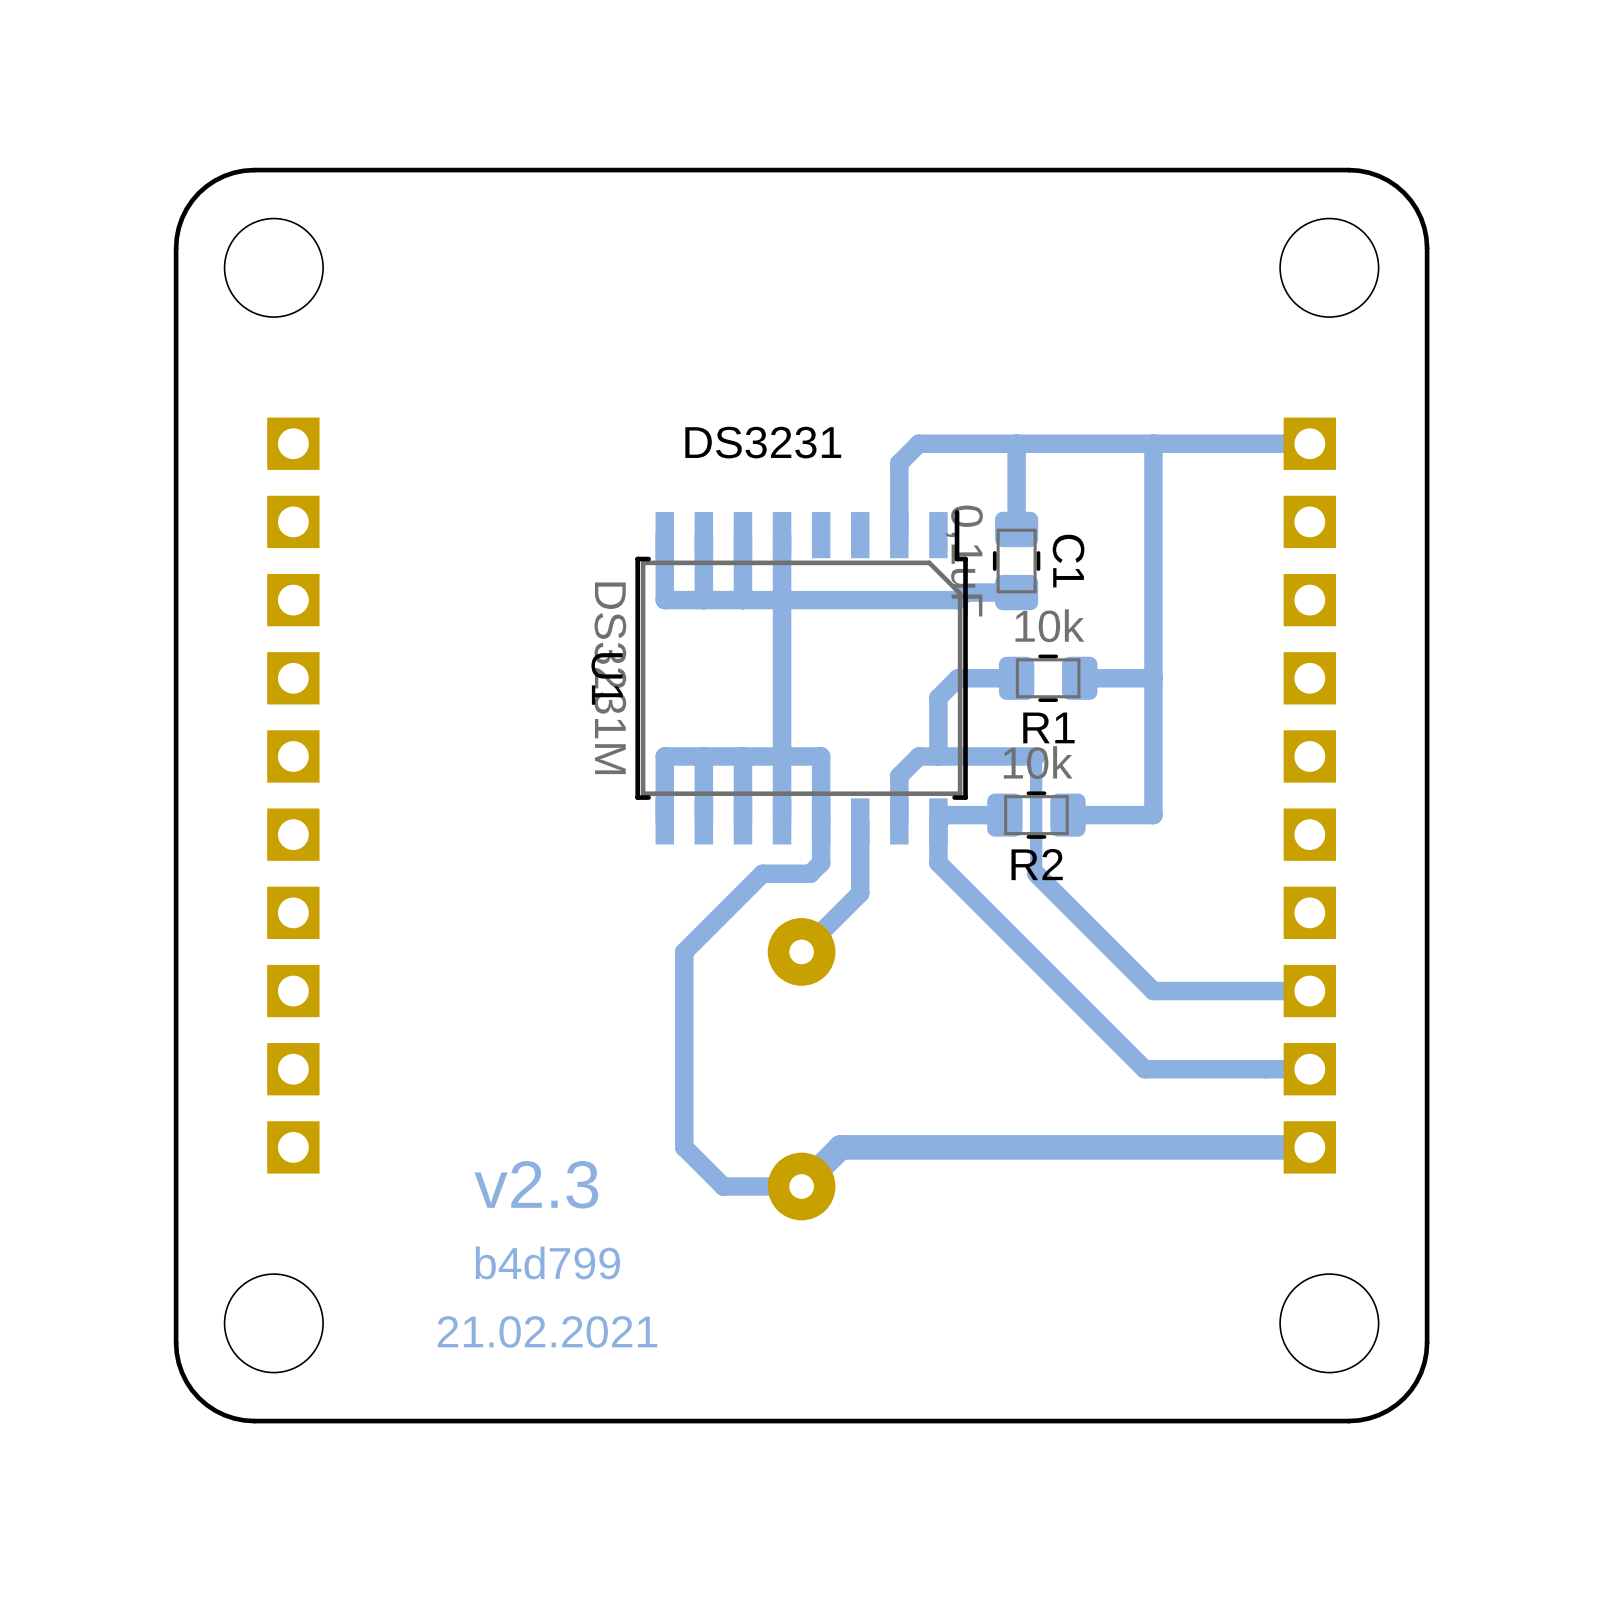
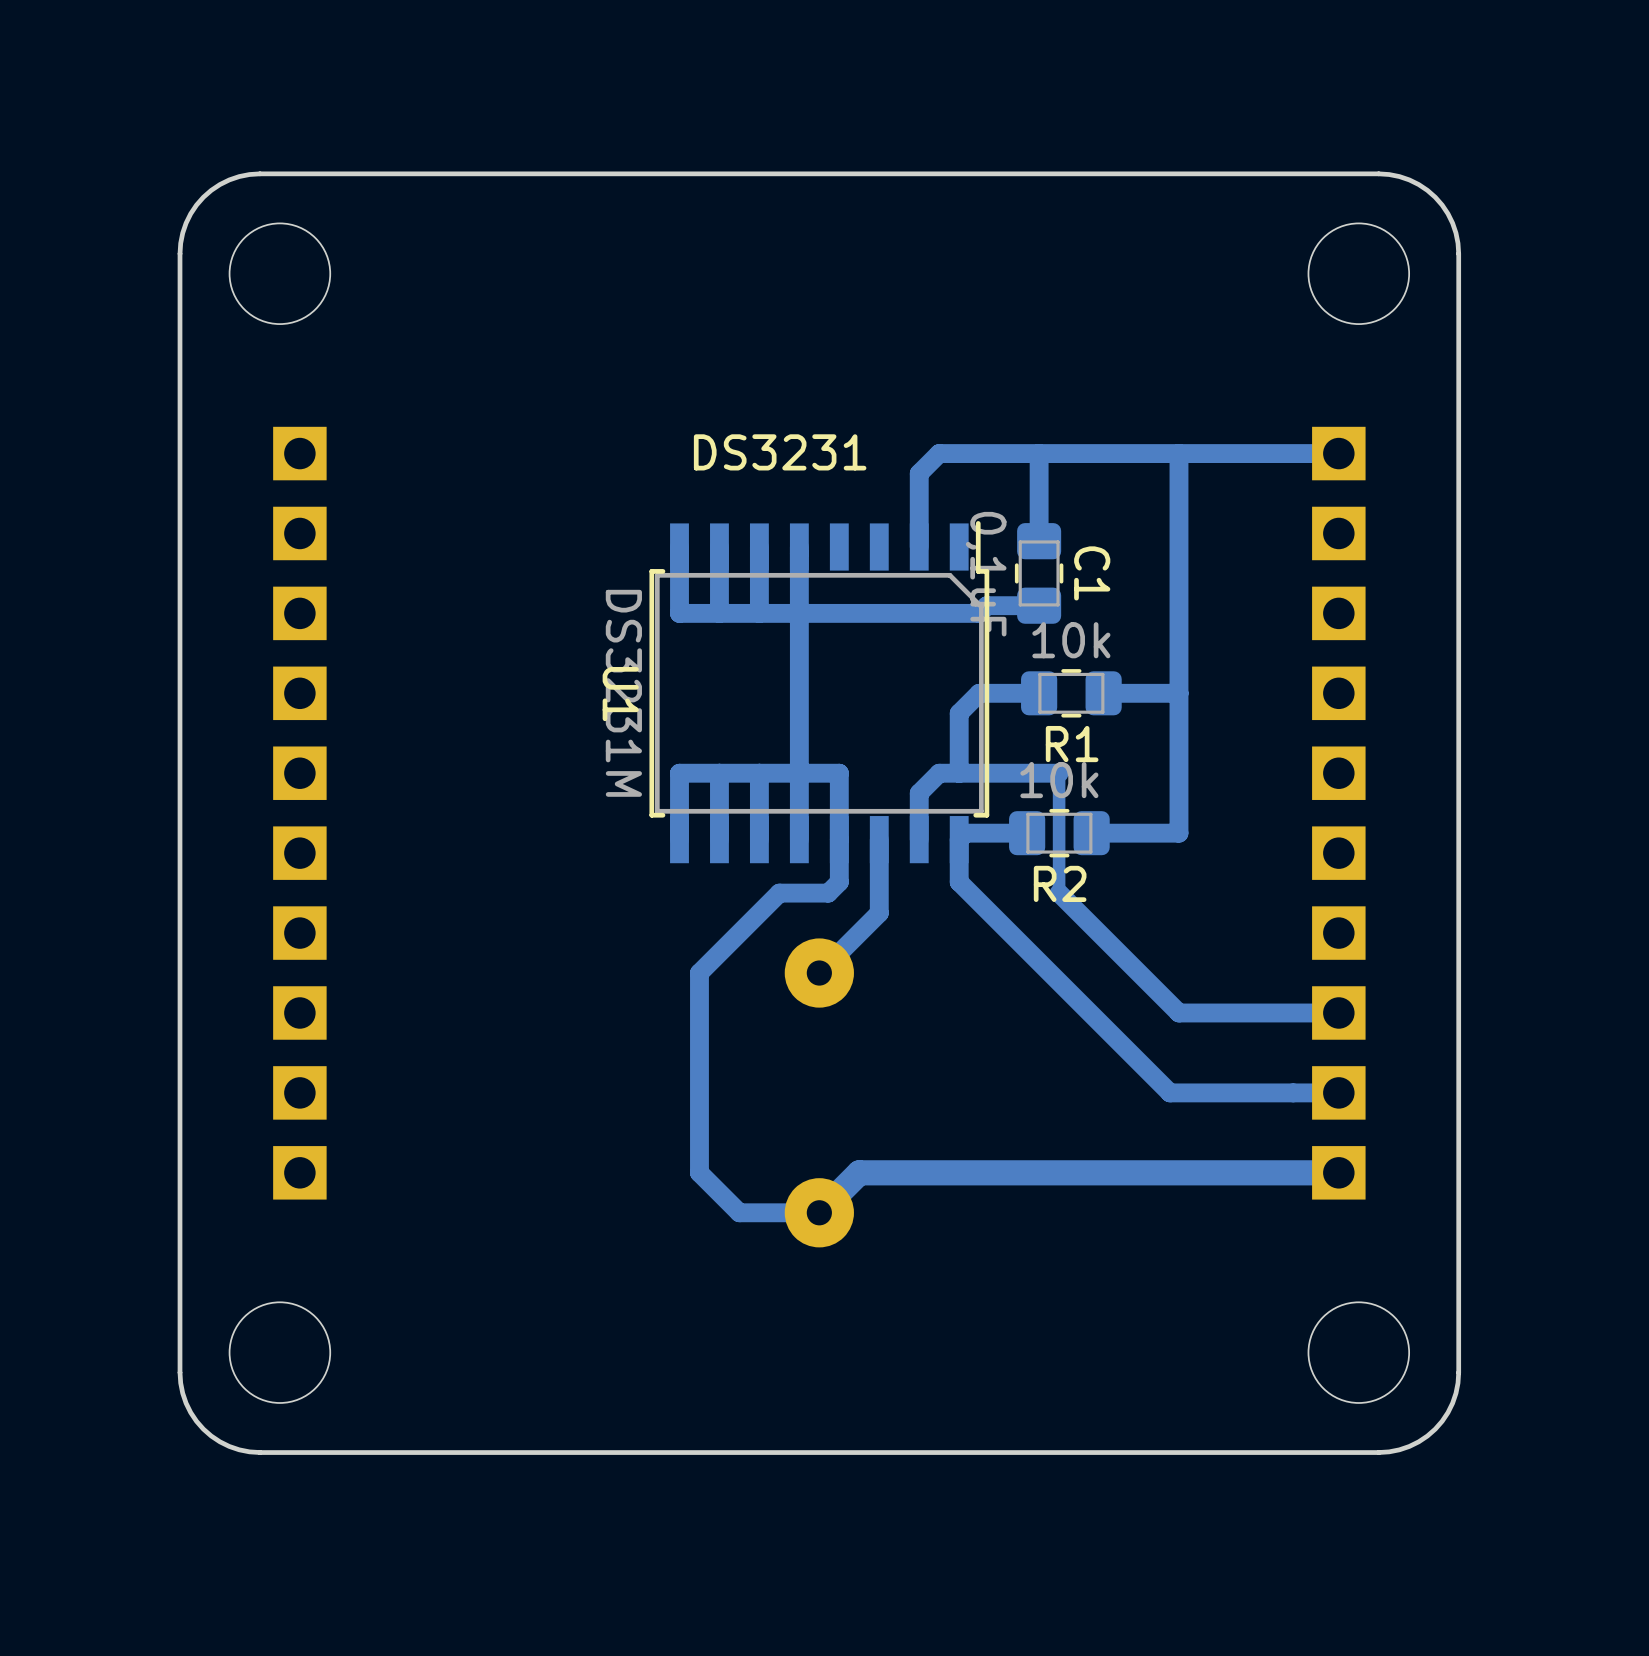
text: v2.3 (536, 1184) -> none
text: b4d799 (547, 1262) -> none
text: 21.02.2021 (547, 1331) -> none

